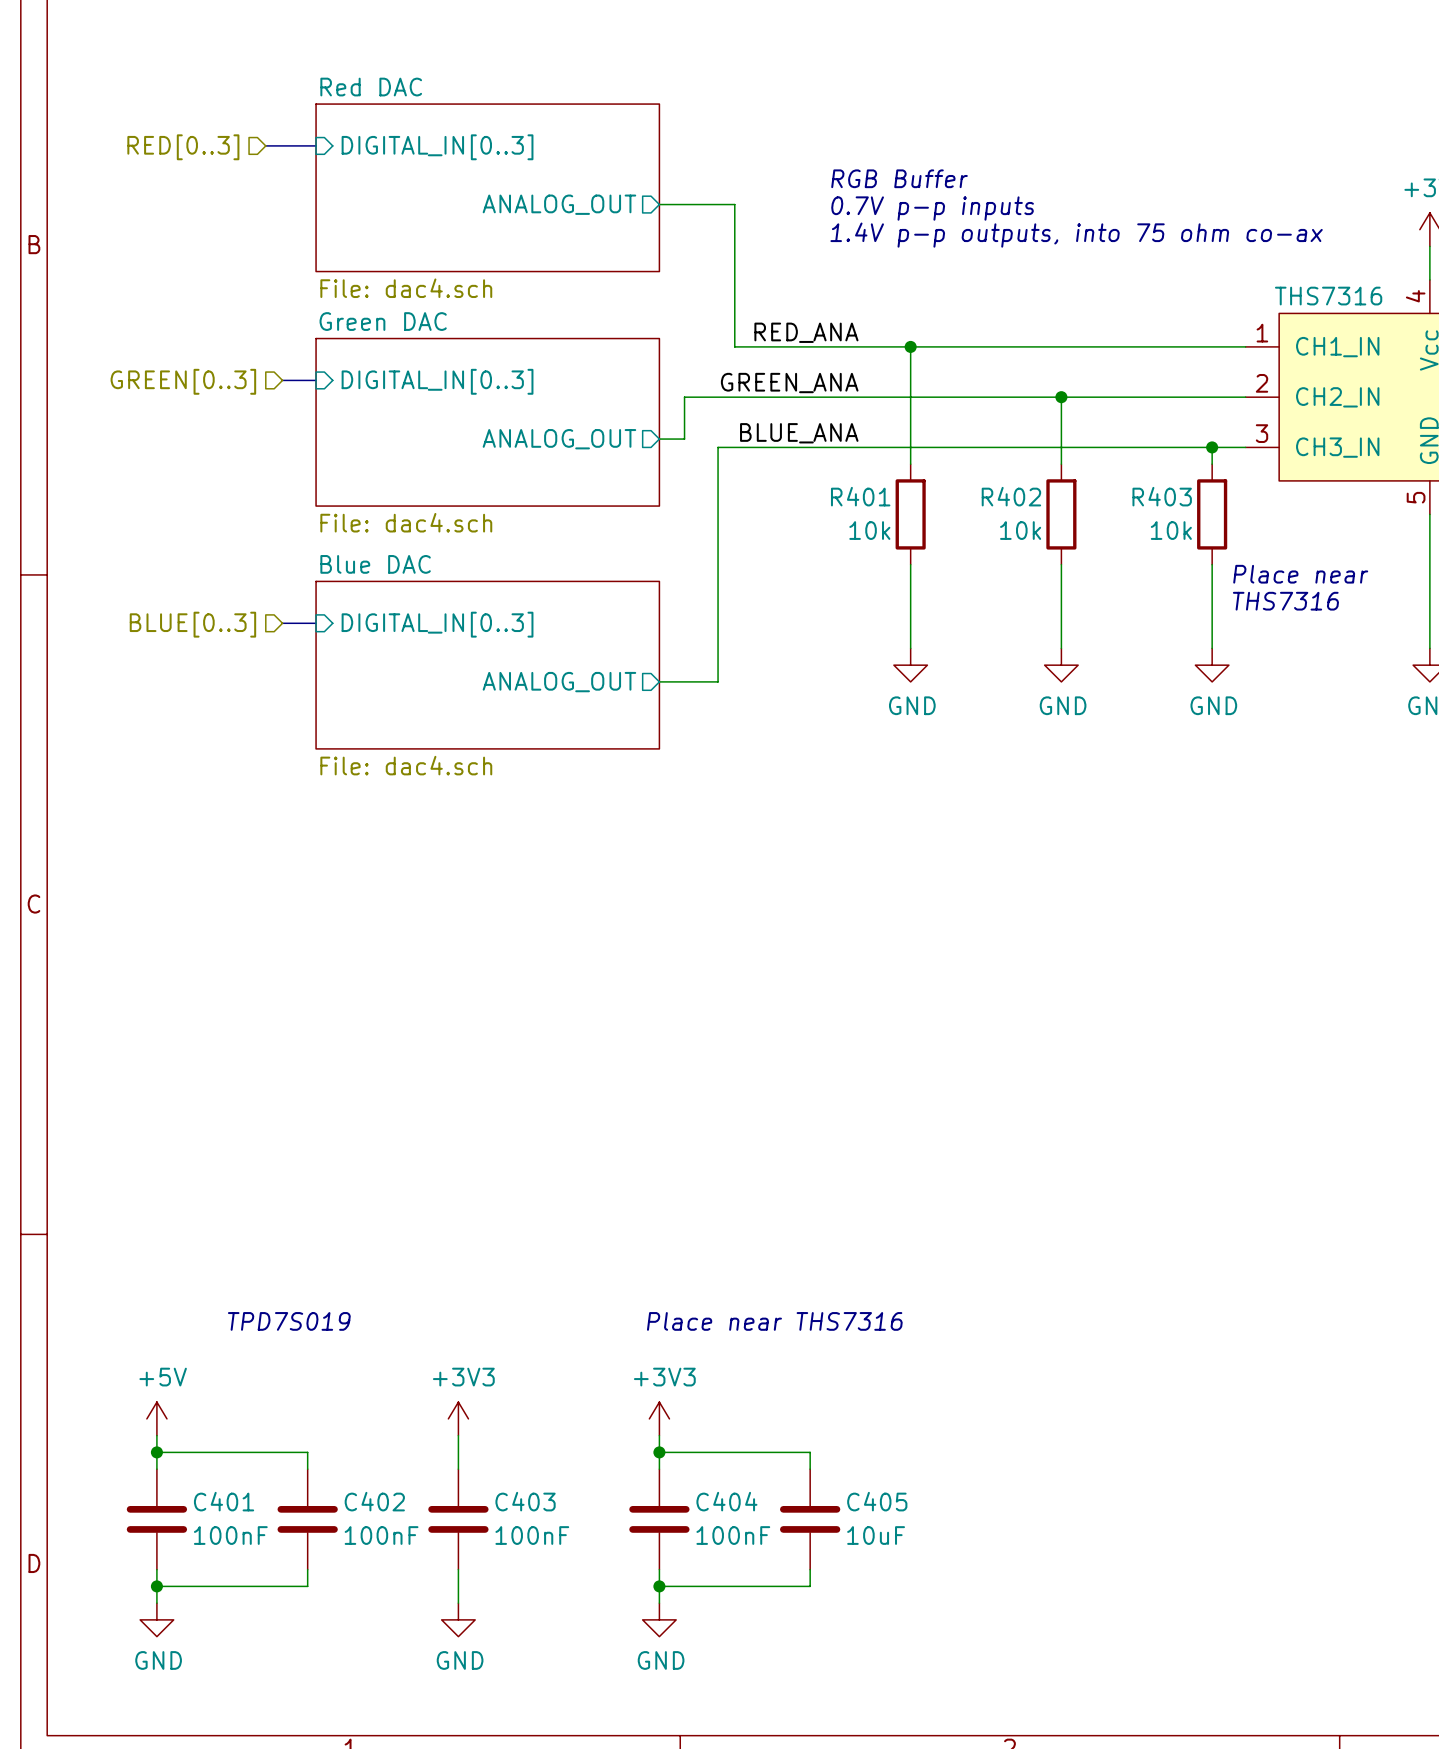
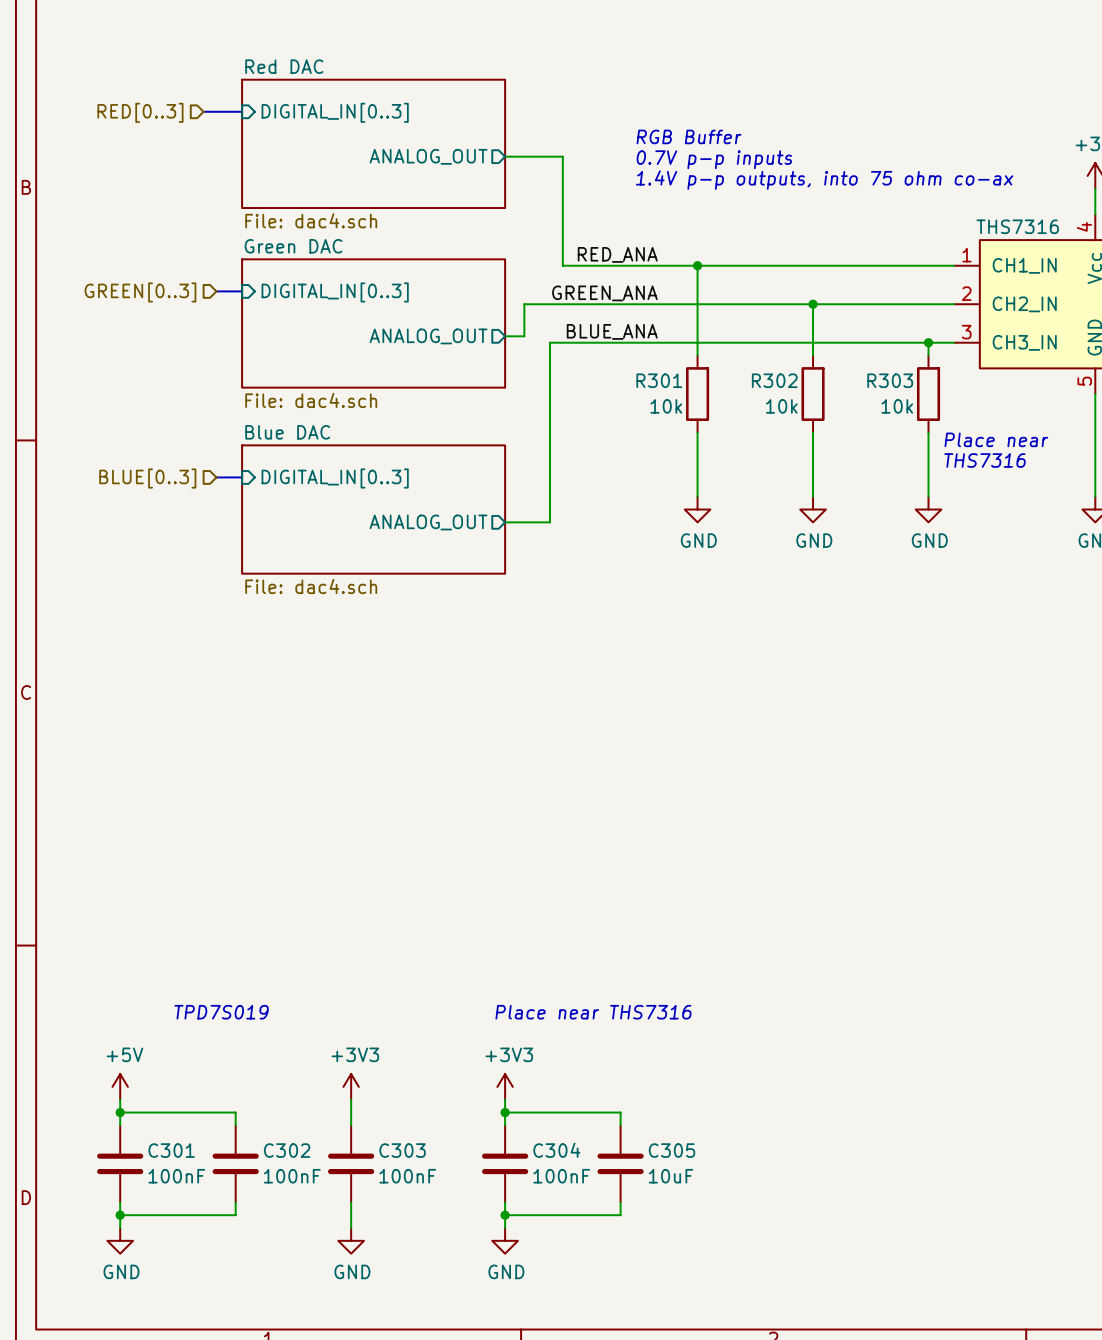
R401 name: R401 (860, 496) -> R301 (659, 380)
R402 name: R402 (1011, 496) -> R302 (774, 380)
R403 name: R403 (1162, 496) -> R303 (890, 380)
C401 name: C401 (224, 1501) -> C301 (171, 1150)
C402 name: C402 (374, 1501) -> C302 (287, 1150)
C403 name: C403 (525, 1501) -> C303 (402, 1150)
C404 name: C404 (726, 1501) -> C304 (556, 1150)
C405 name: C405 (877, 1501) -> C305 (672, 1150)

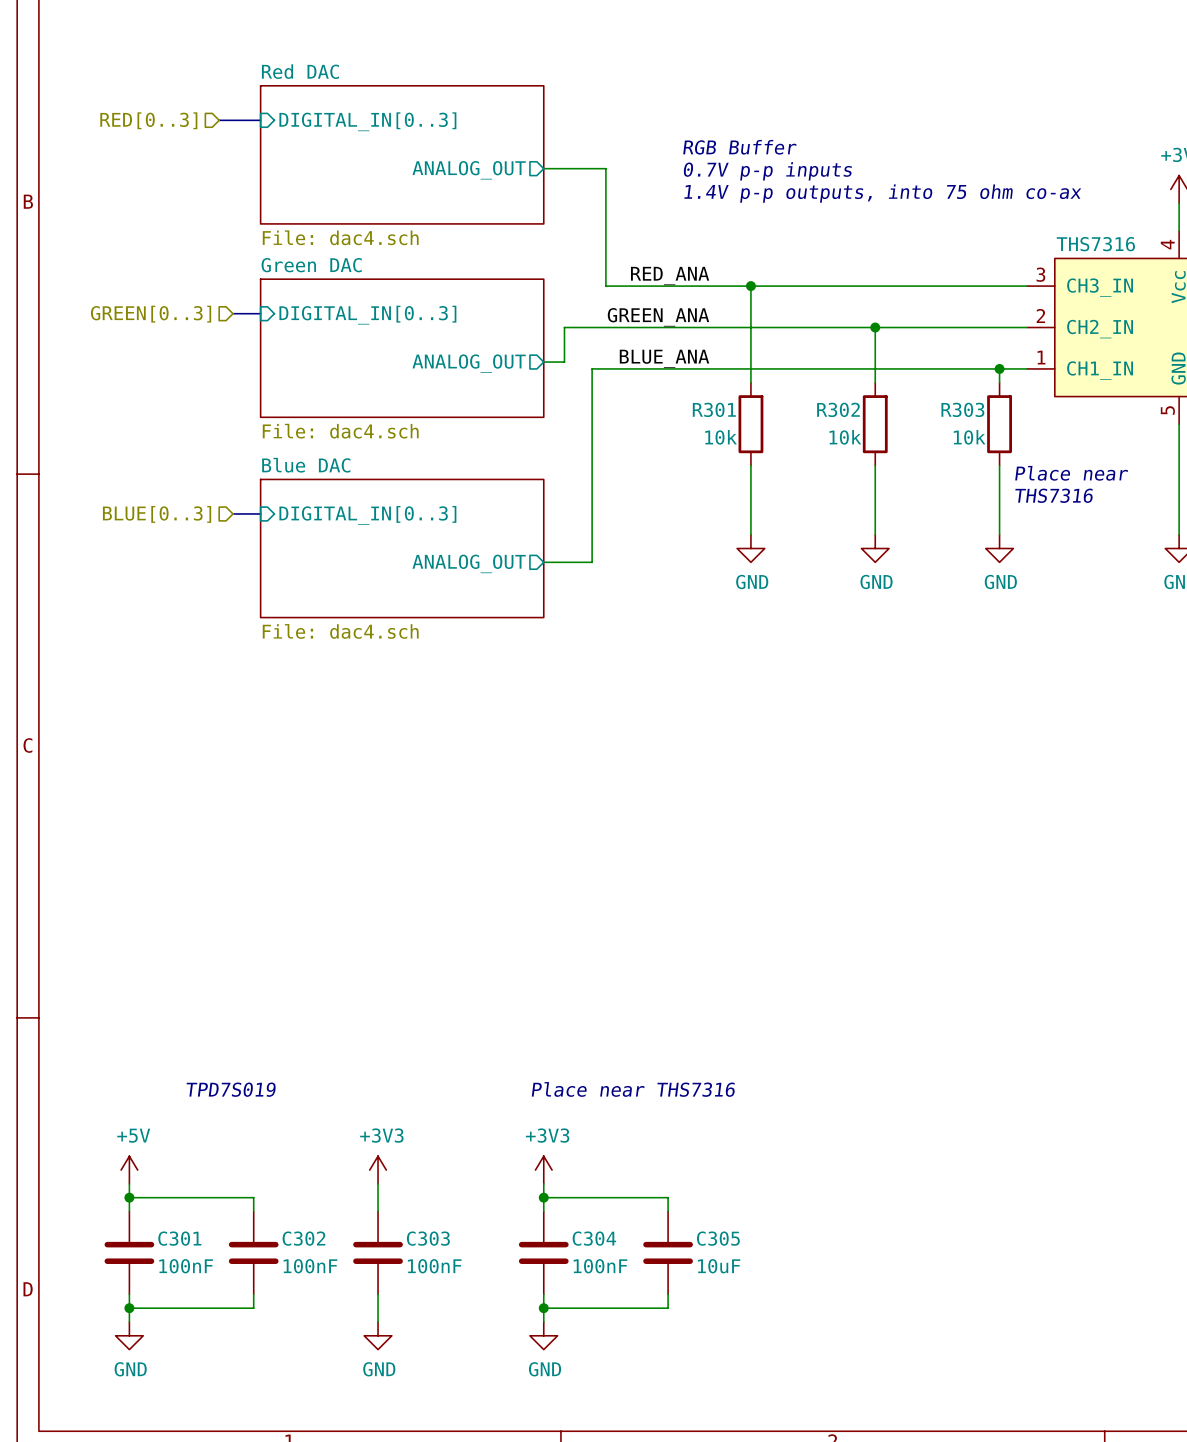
part pin number: 1 (967, 255) -> 3 (1040, 274)
part pin name: CH1_IN (1024, 265) -> CH3_IN (1100, 287)
part pin number: 3 (966, 332) -> 1 (1041, 357)
part pin name: CH3_IN (1024, 342) -> CH1_IN (1100, 370)

